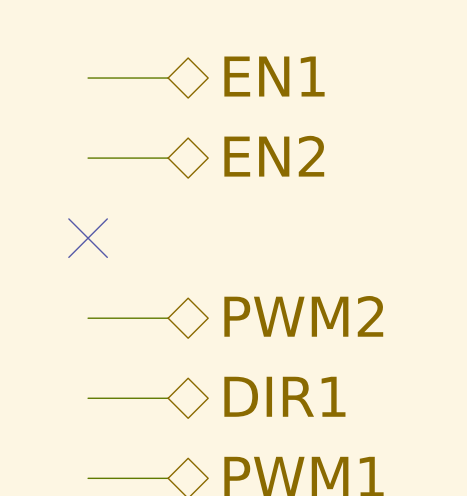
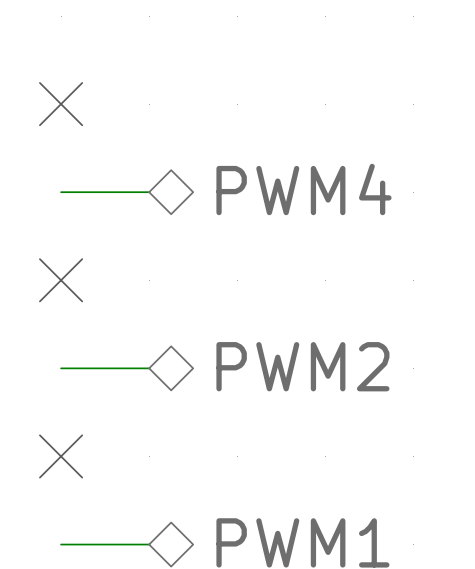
hierarchical label: EN1 (274, 76) -> none
wire: (88, 78) (168, 78) -> none
no-connect mark: none -> (61, 104)
hierarchical label: EN2 (274, 156) -> PWM4 (303, 189)
hierarchical label: DIR1 (284, 396) -> none
wire: (88, 398) (168, 398) -> none
no-connect mark: none -> (61, 456)

